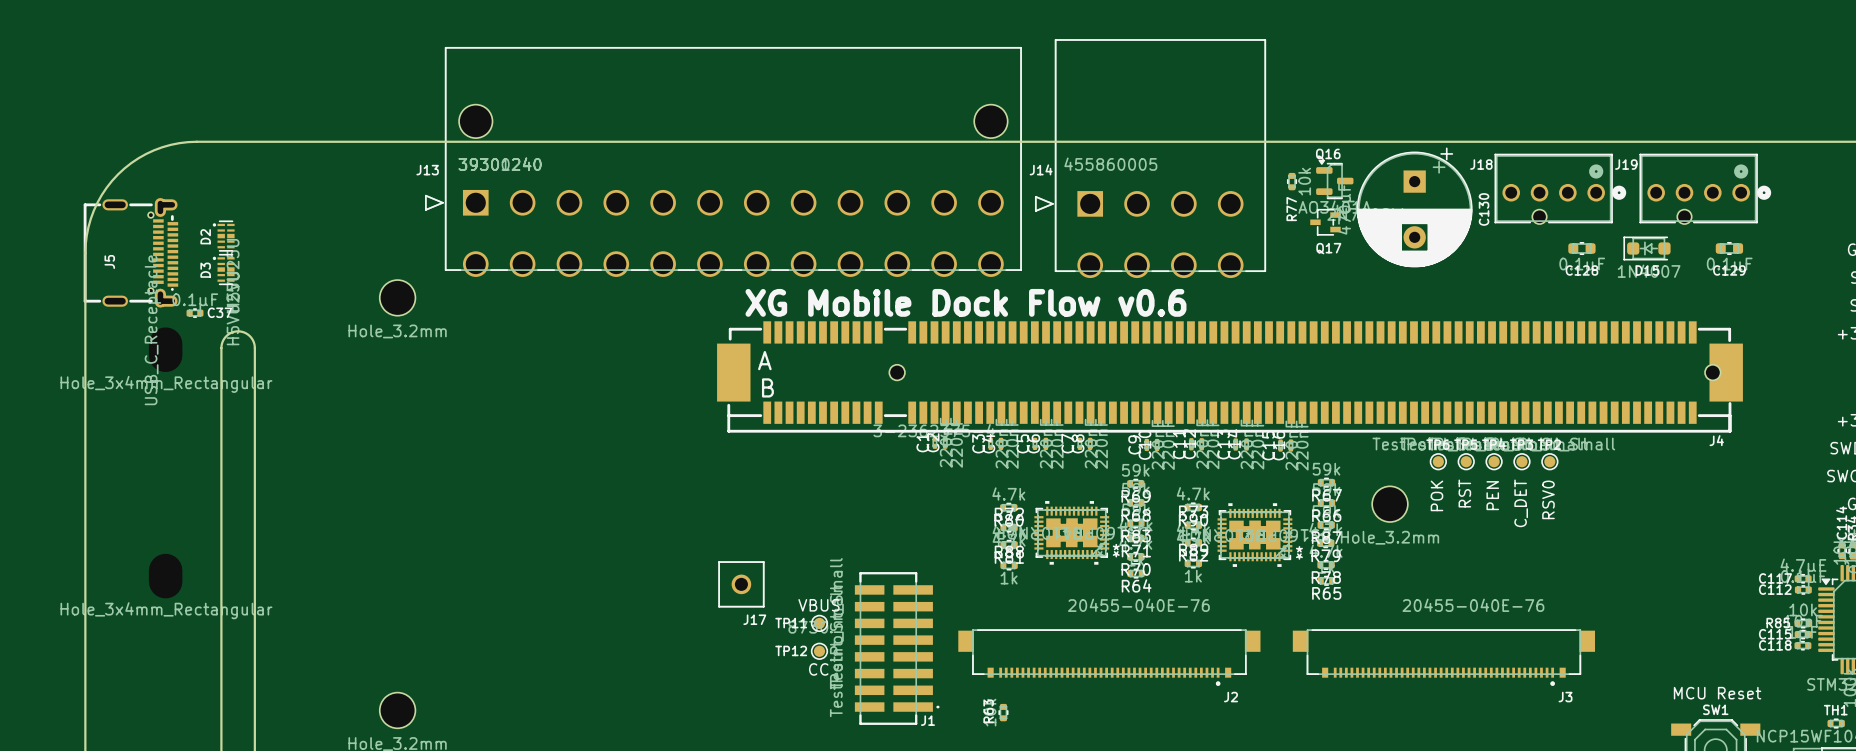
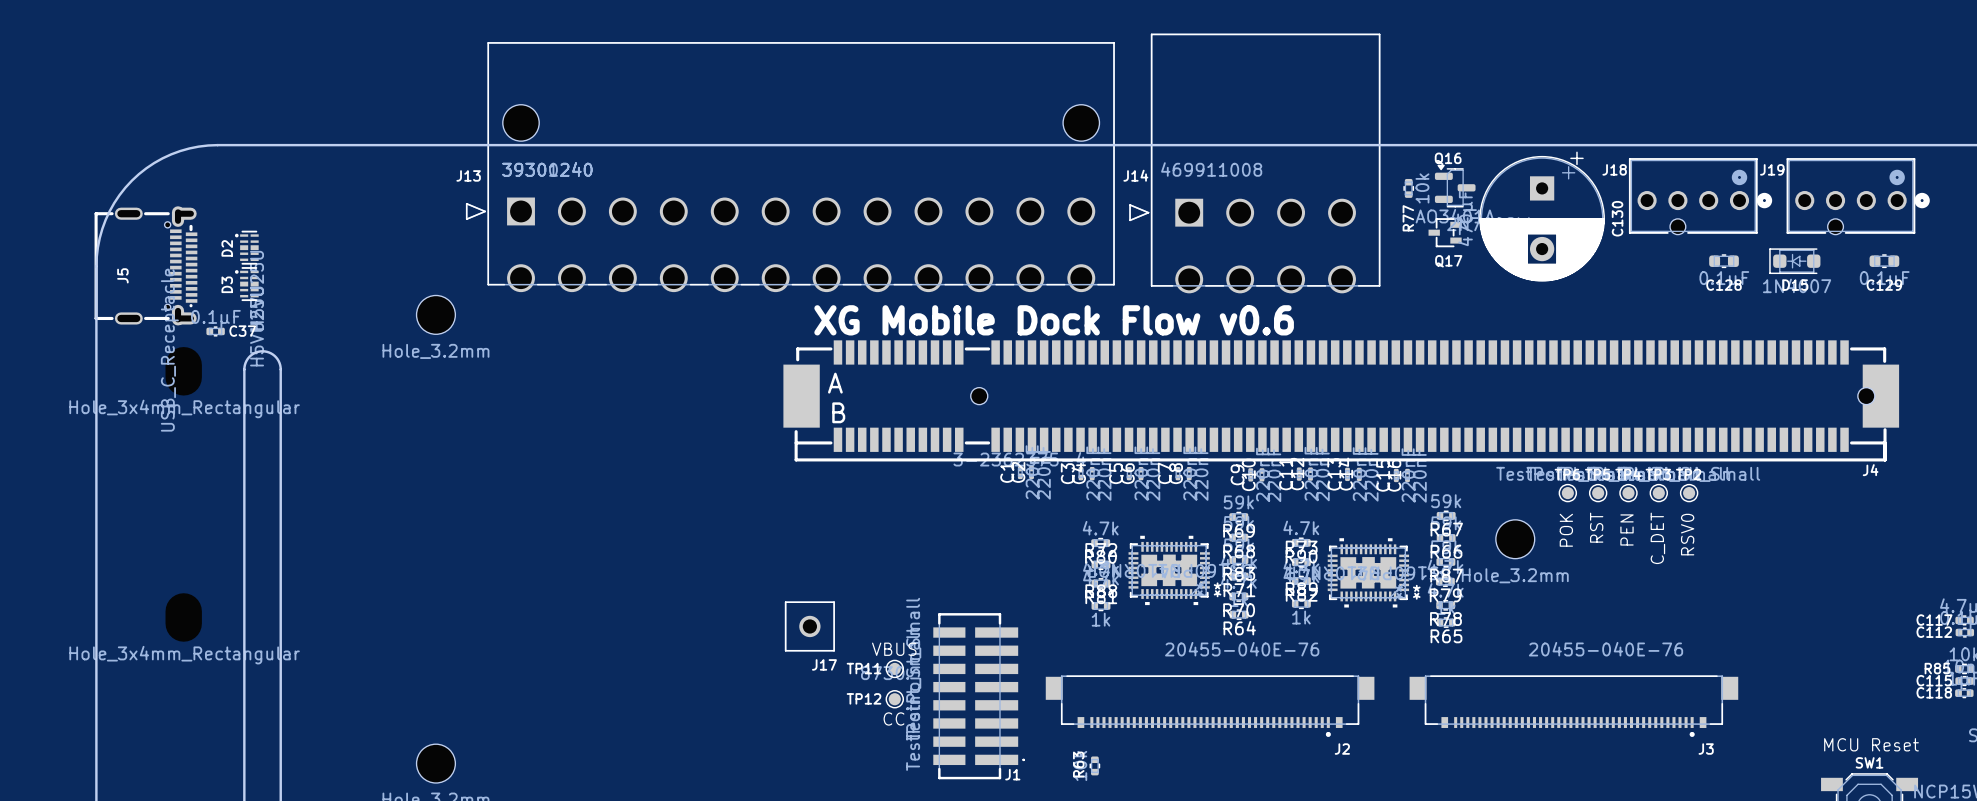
J14 value: 455860005 (1110, 164) -> 469911008 (1211, 169)

